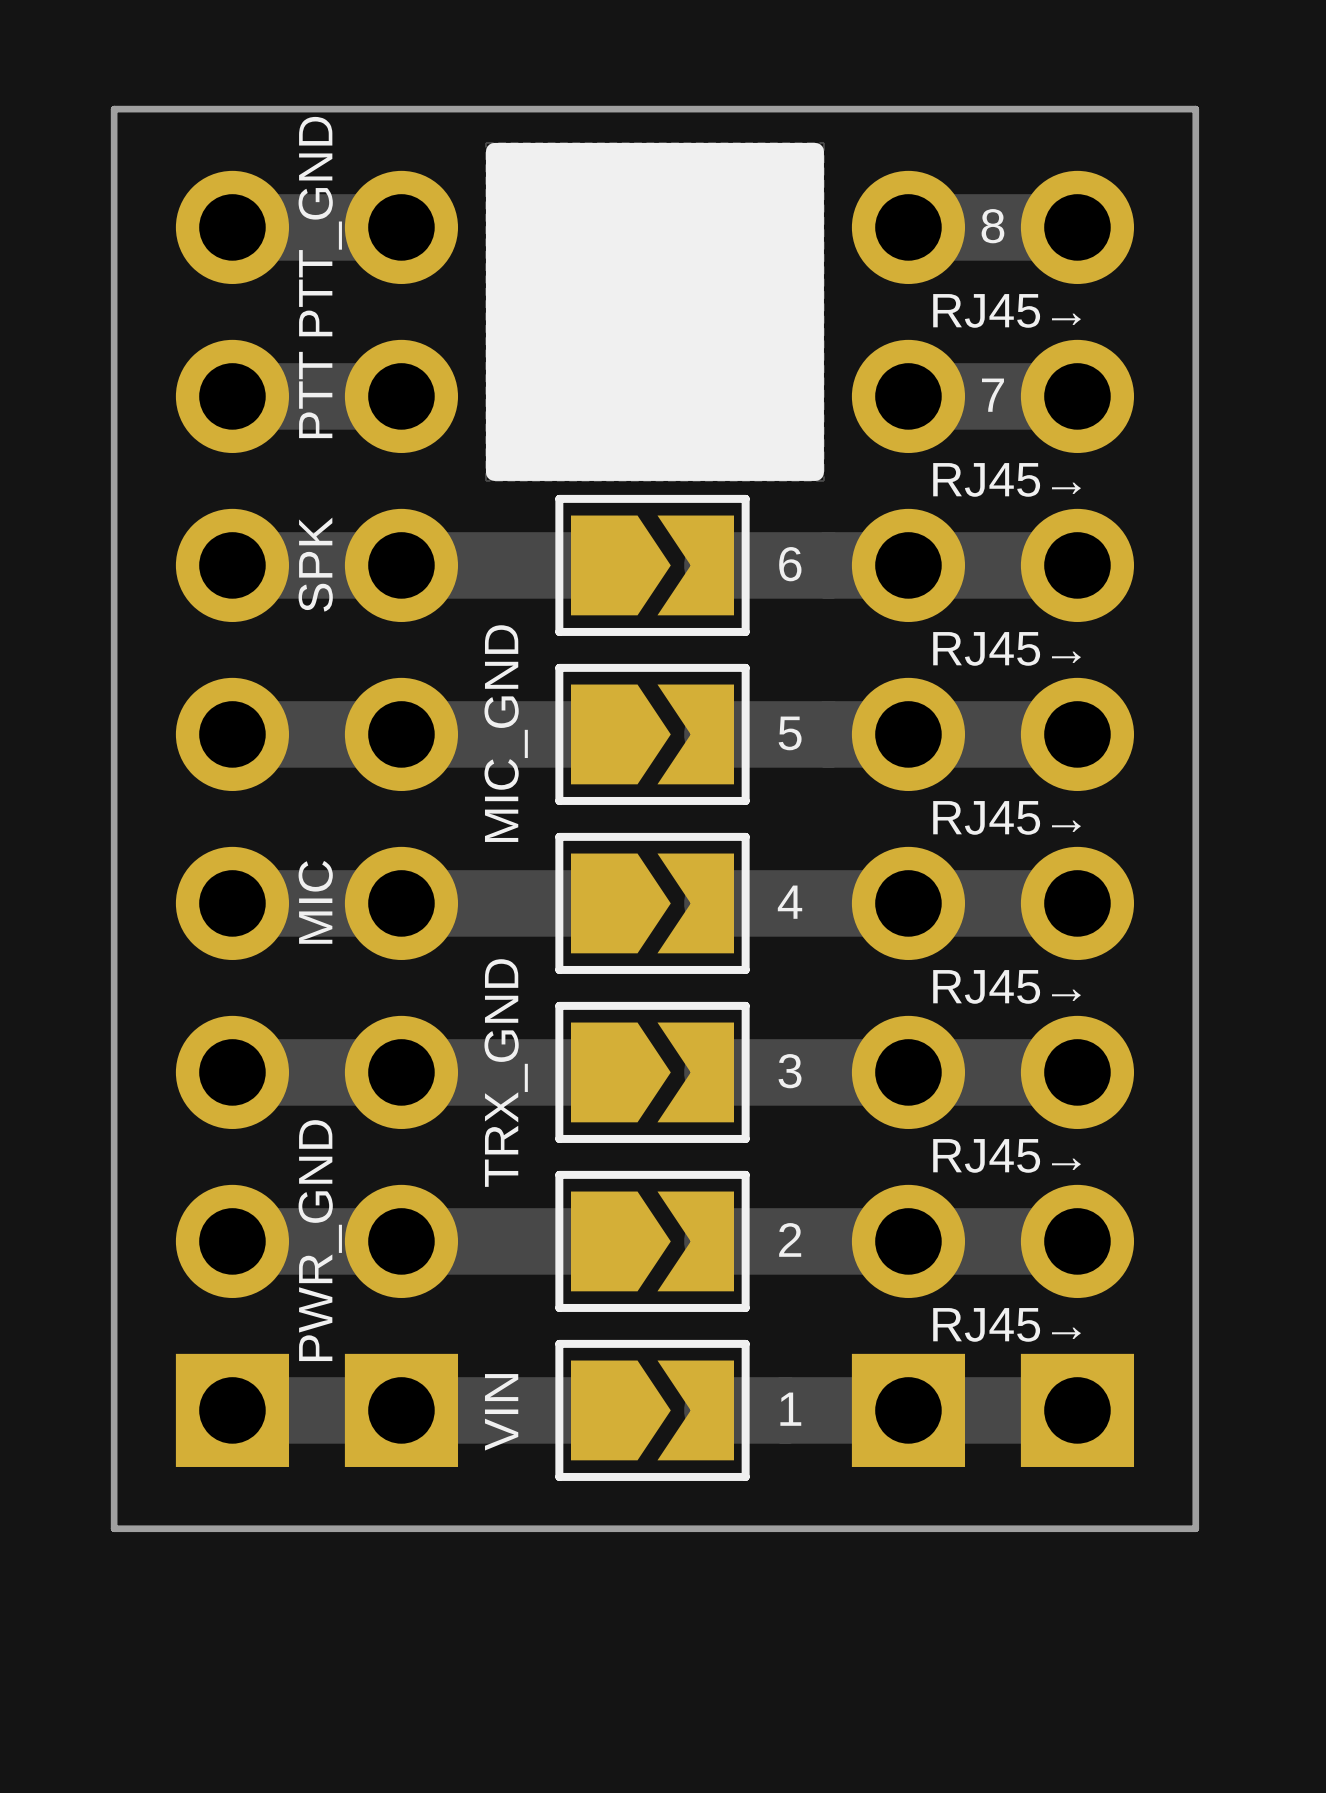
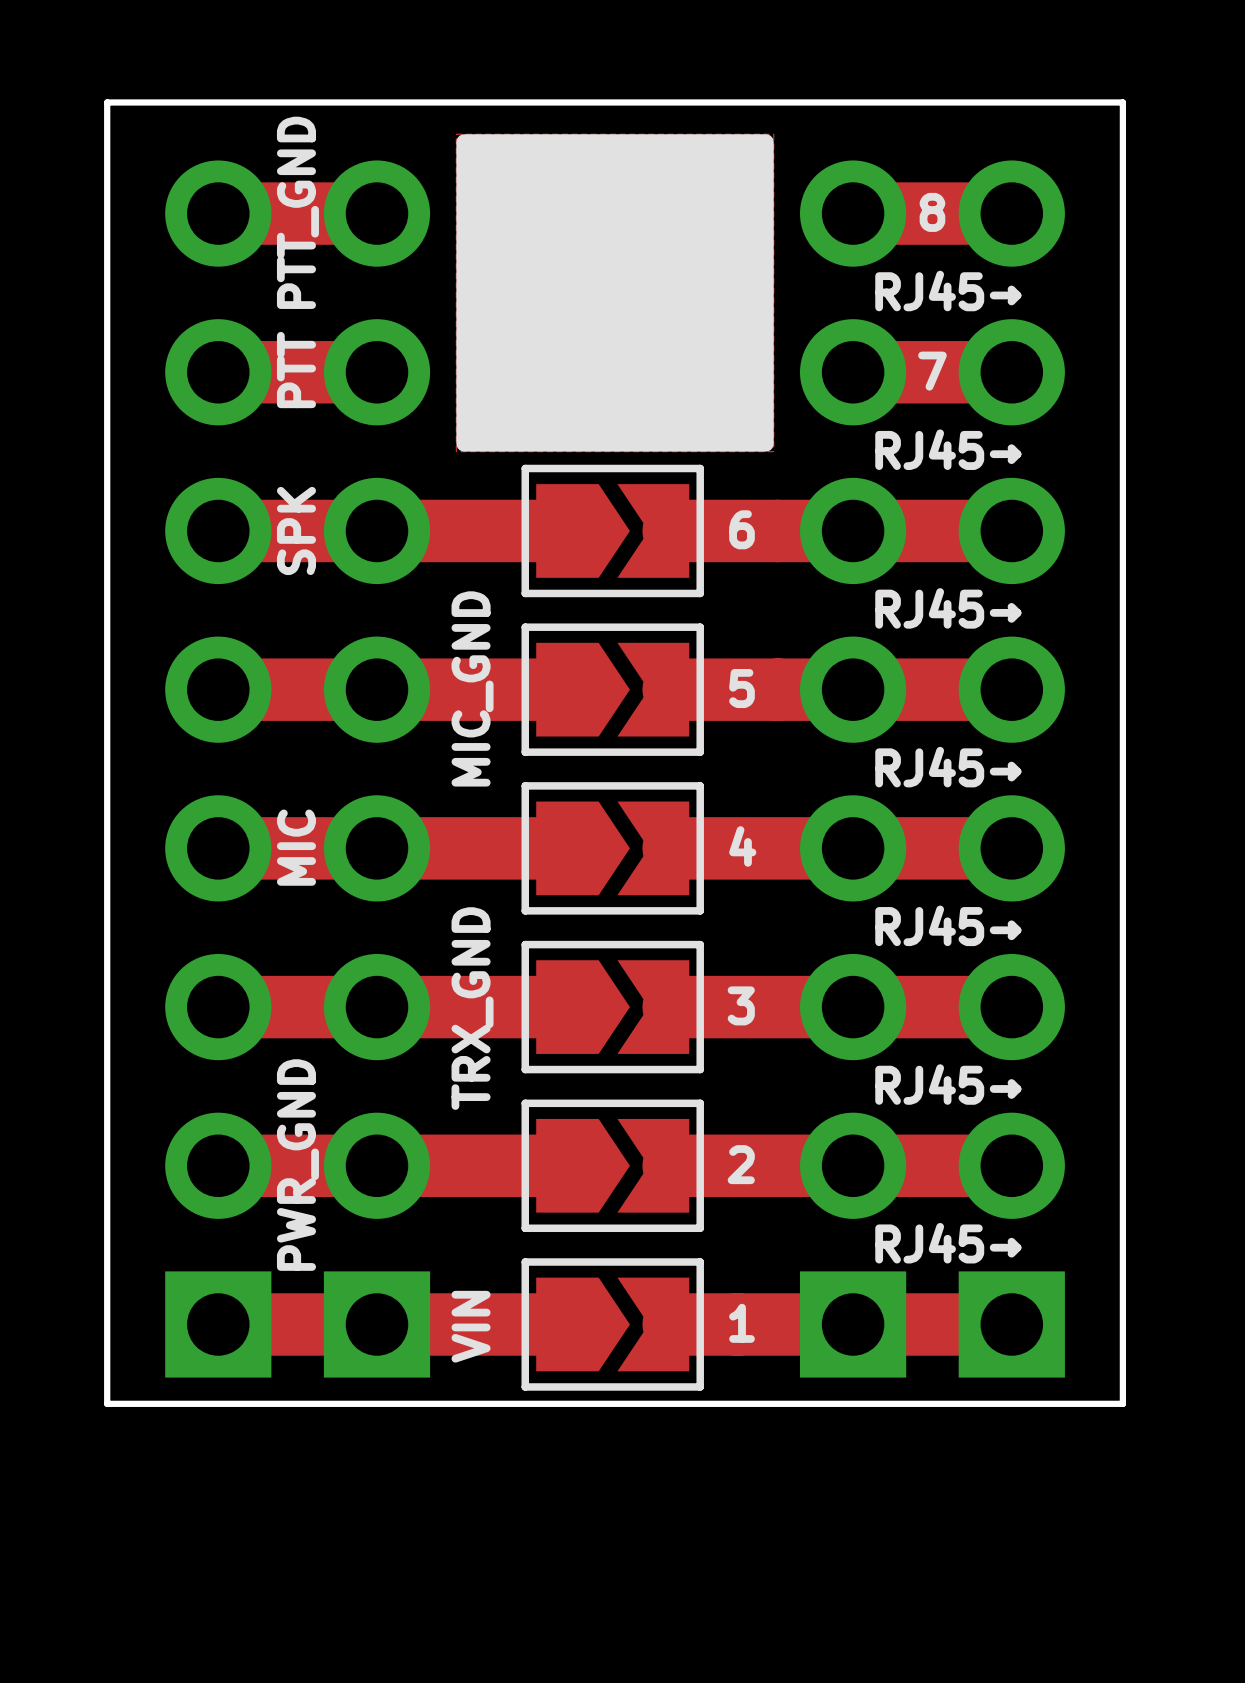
board edge: (114, 1494) (114, 1528) (1195, 1528) (1195, 1494) -> (107, 1403) (1122, 1403)

